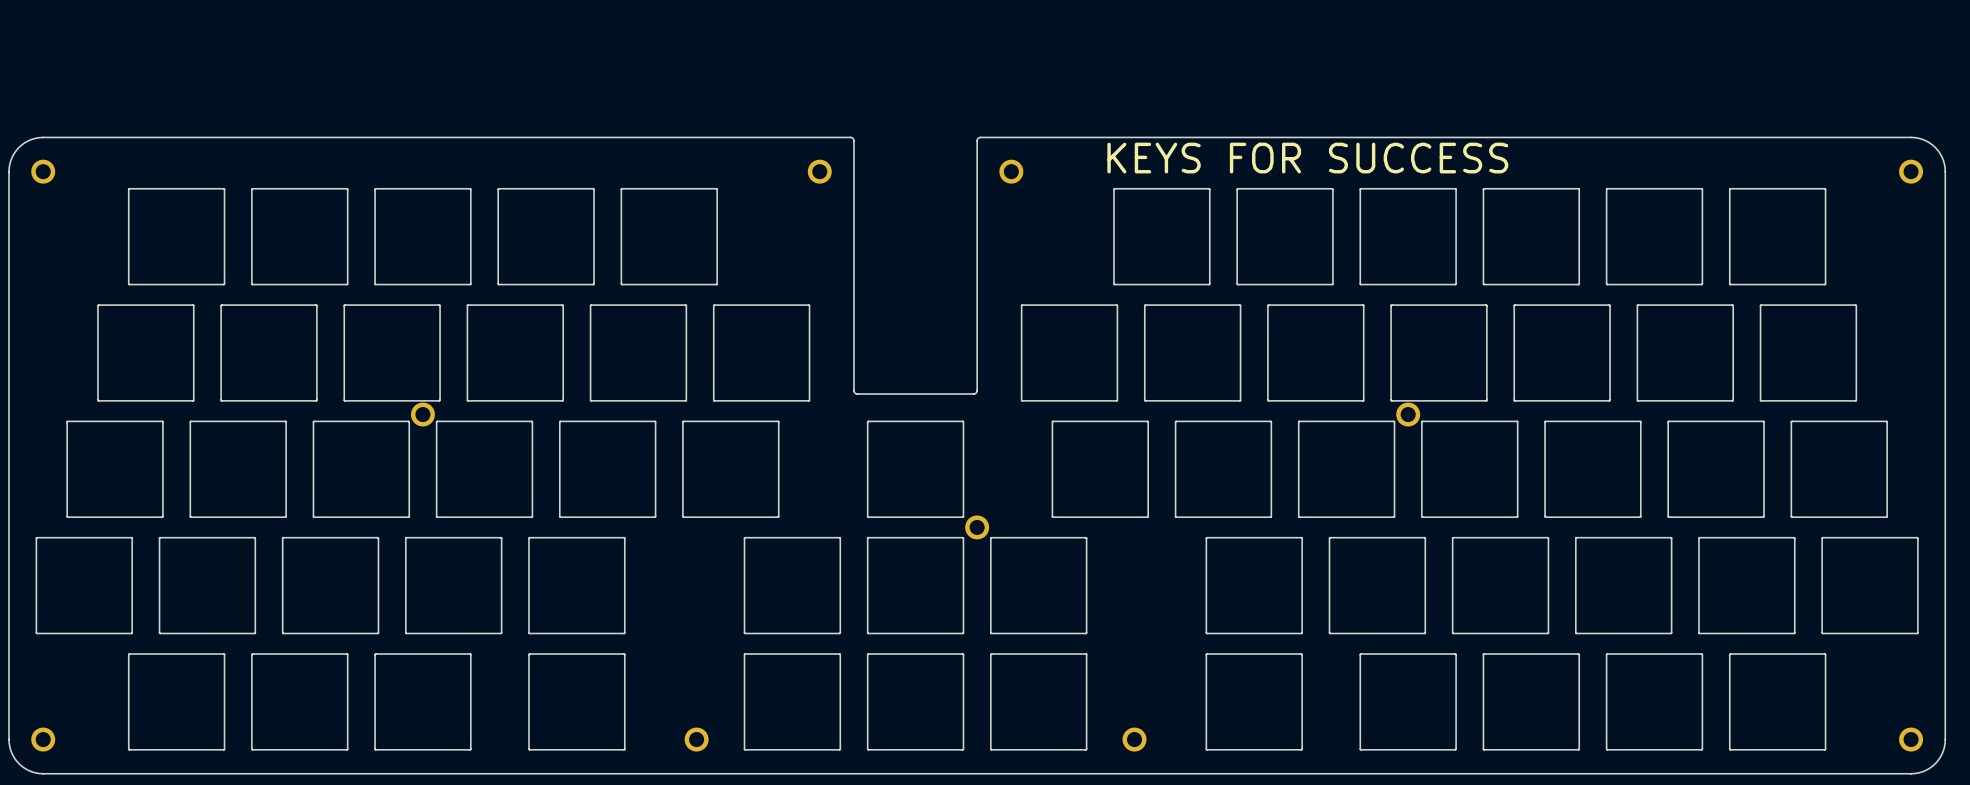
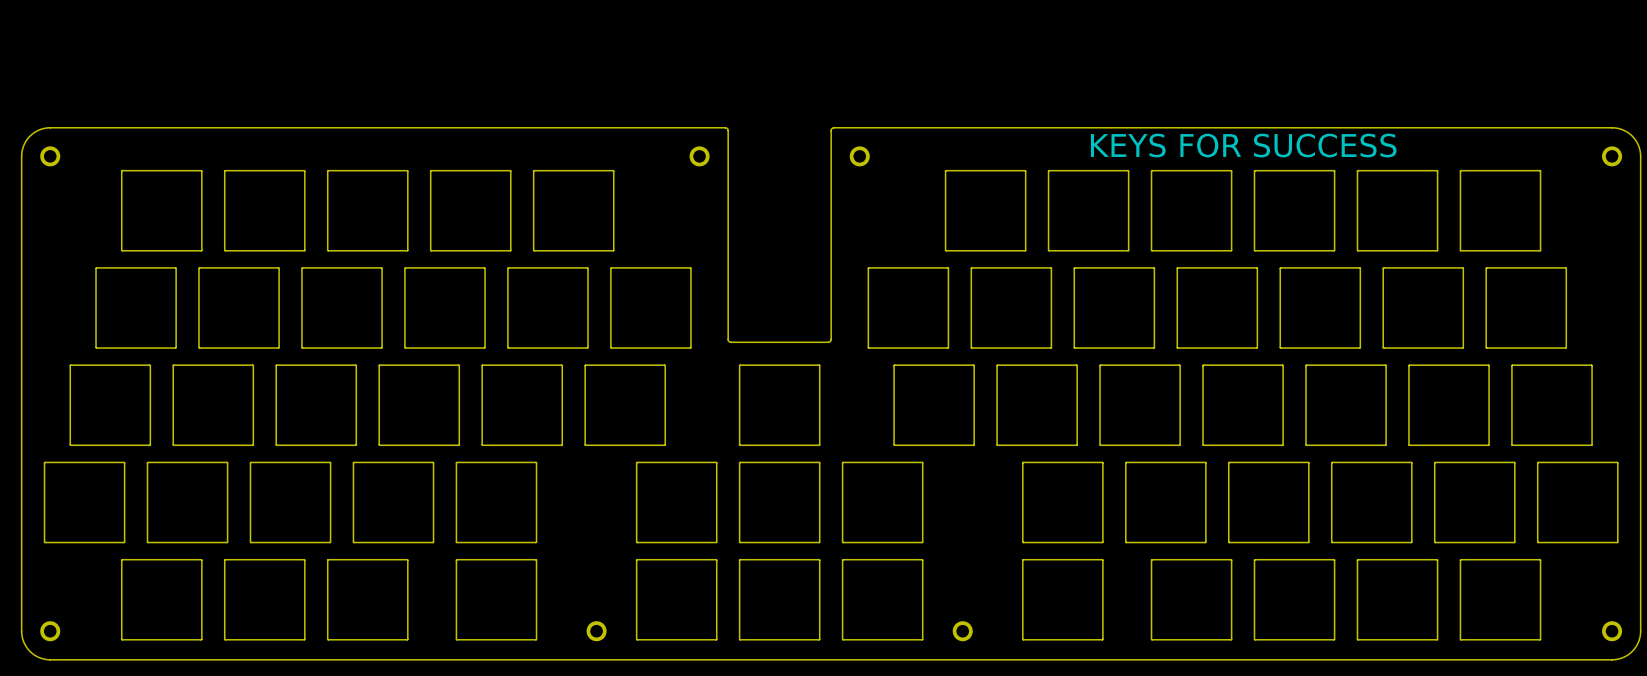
text: KEYS FOR SUCCESS (1307, 158) -> none
text: none -> KEYS FOR SUCCESS (1243, 145)
part: (422, 414) -> none
part: (1408, 414) -> none
part: (977, 527) -> none

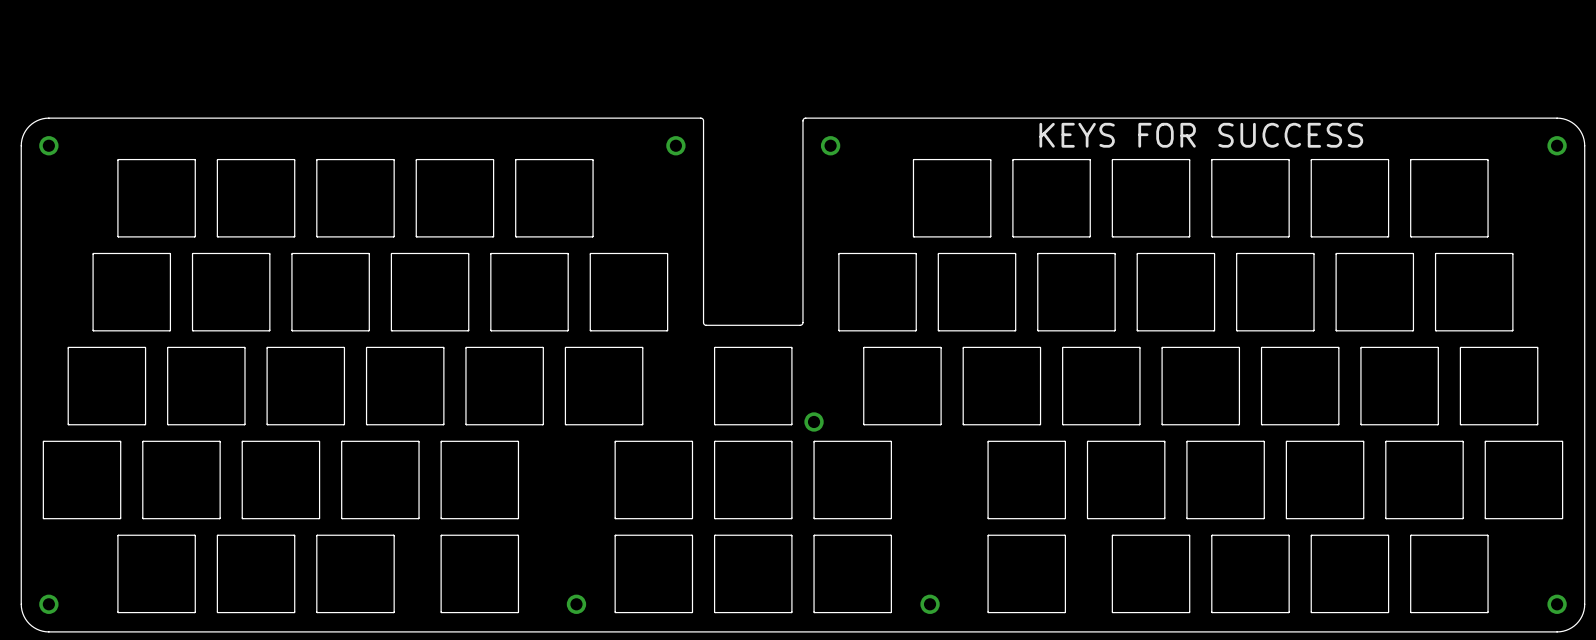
part: none -> (814, 421)

